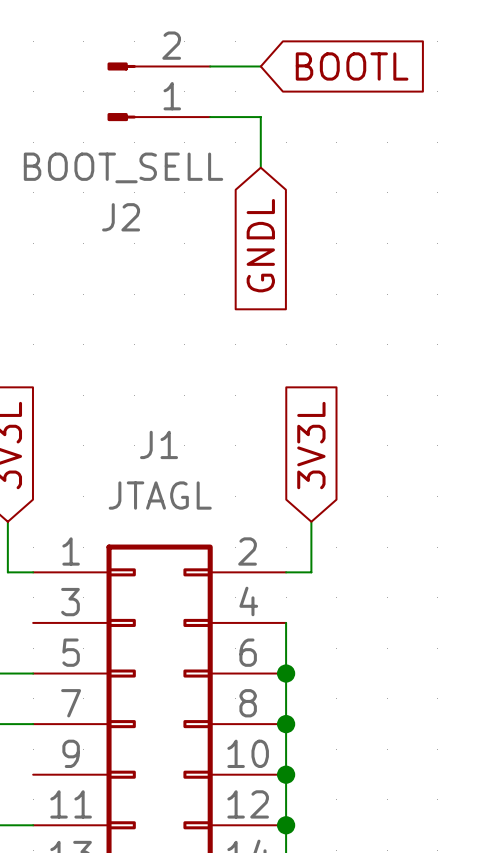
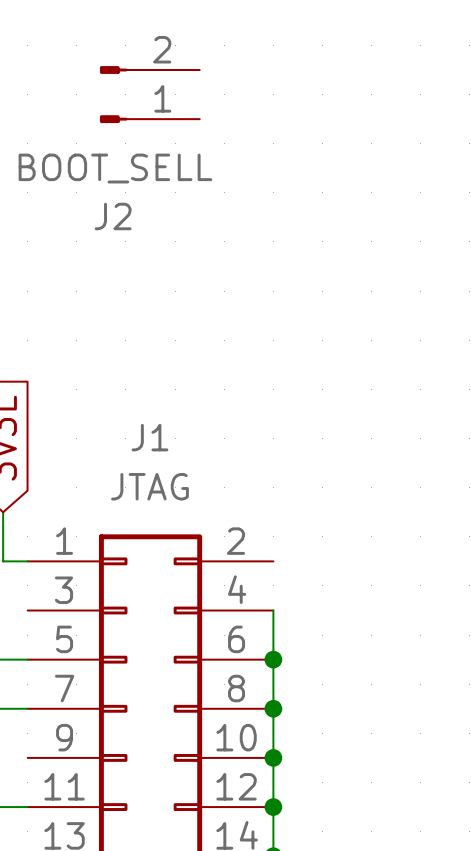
wire: (210, 66) (260, 66) -> none
global label: BOOTL (352, 66) -> none
wire: (210, 117) (260, 117) (260, 167) -> none
global label: GNDL (260, 245) -> none
global label: 3V3L (311, 445) -> none
J1 value: JTAGL (160, 495) -> JTAG (149, 486)
wire: (311, 521) (311, 572) (286, 572) -> none

